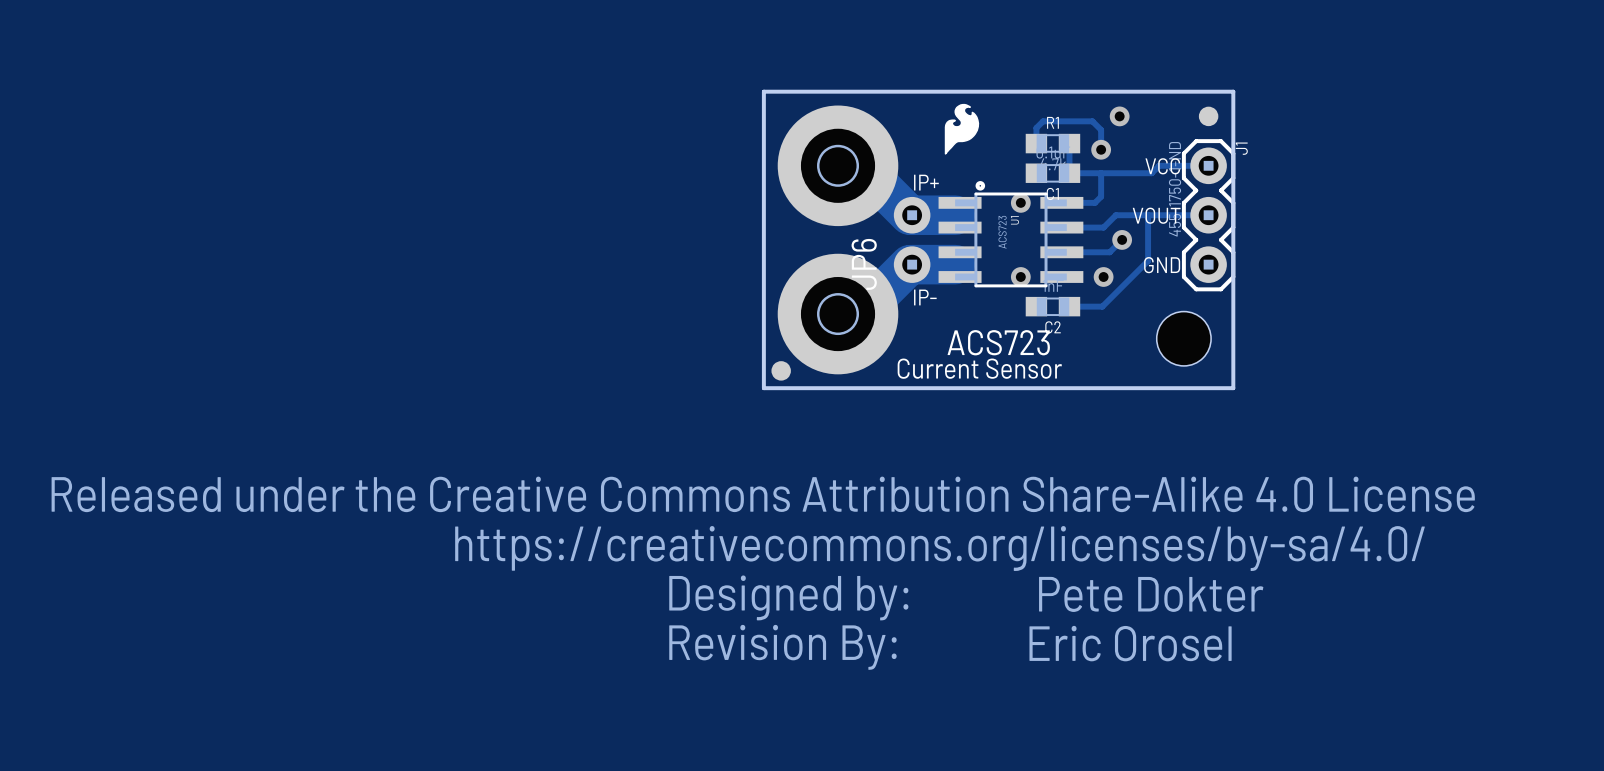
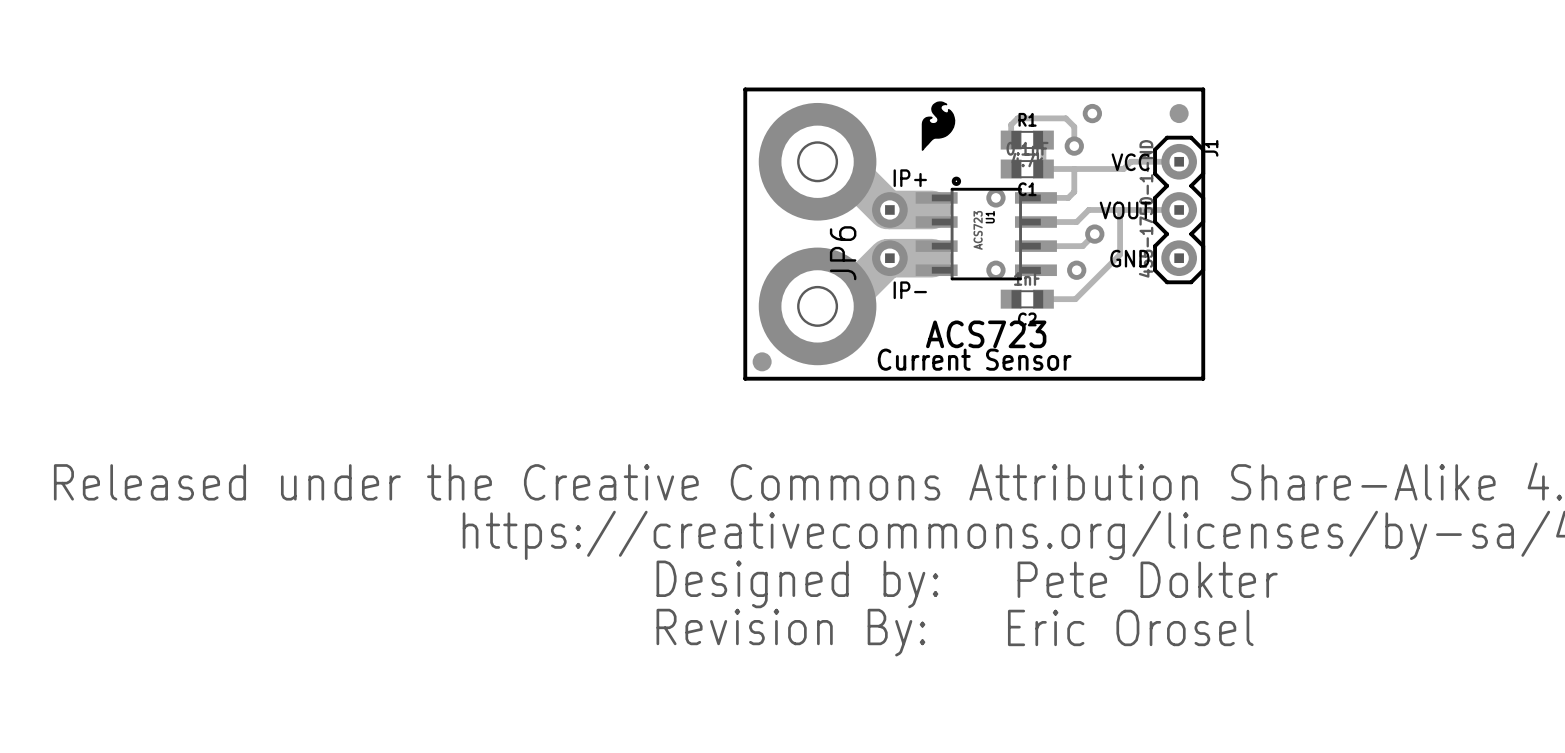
part: (1183, 338) -> none

